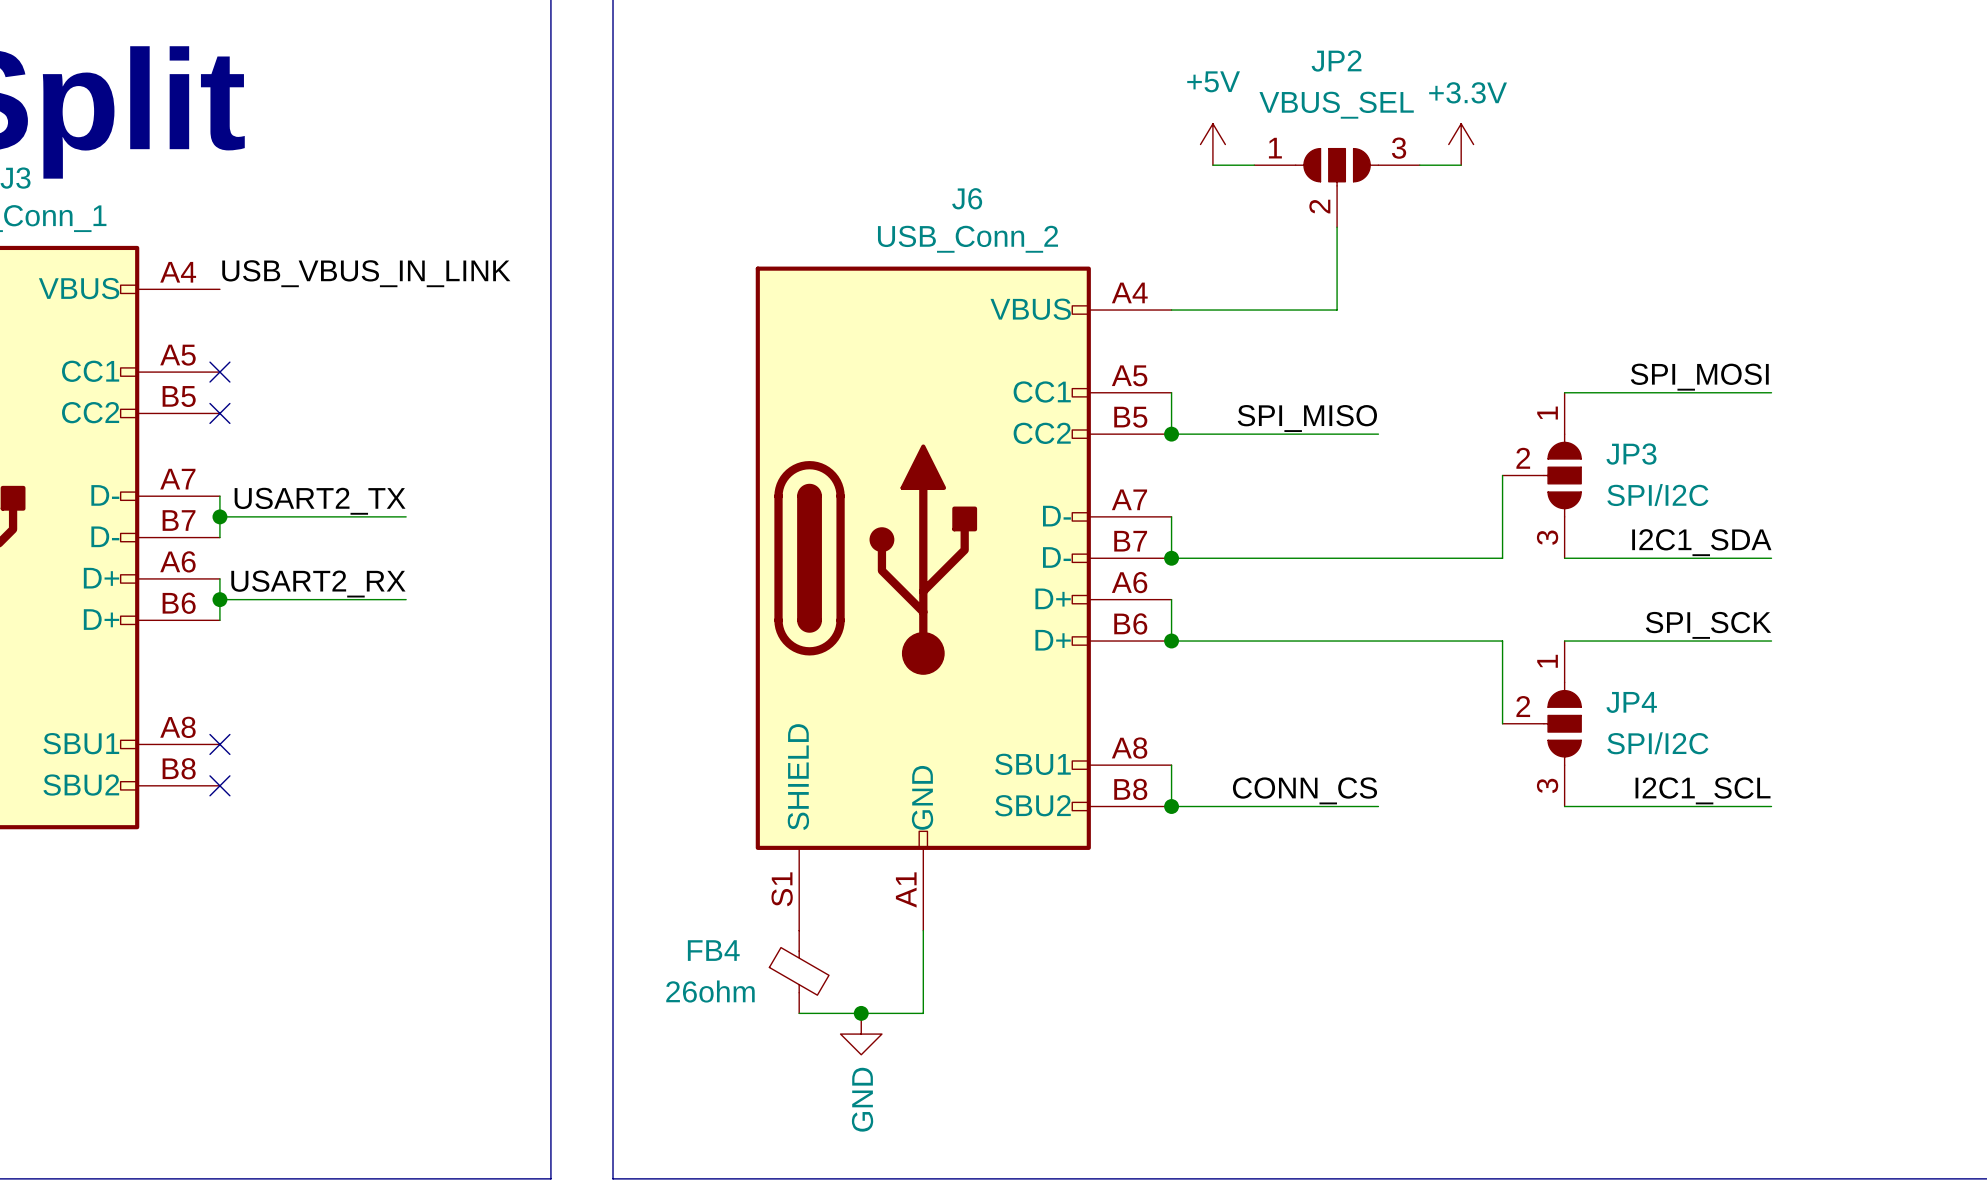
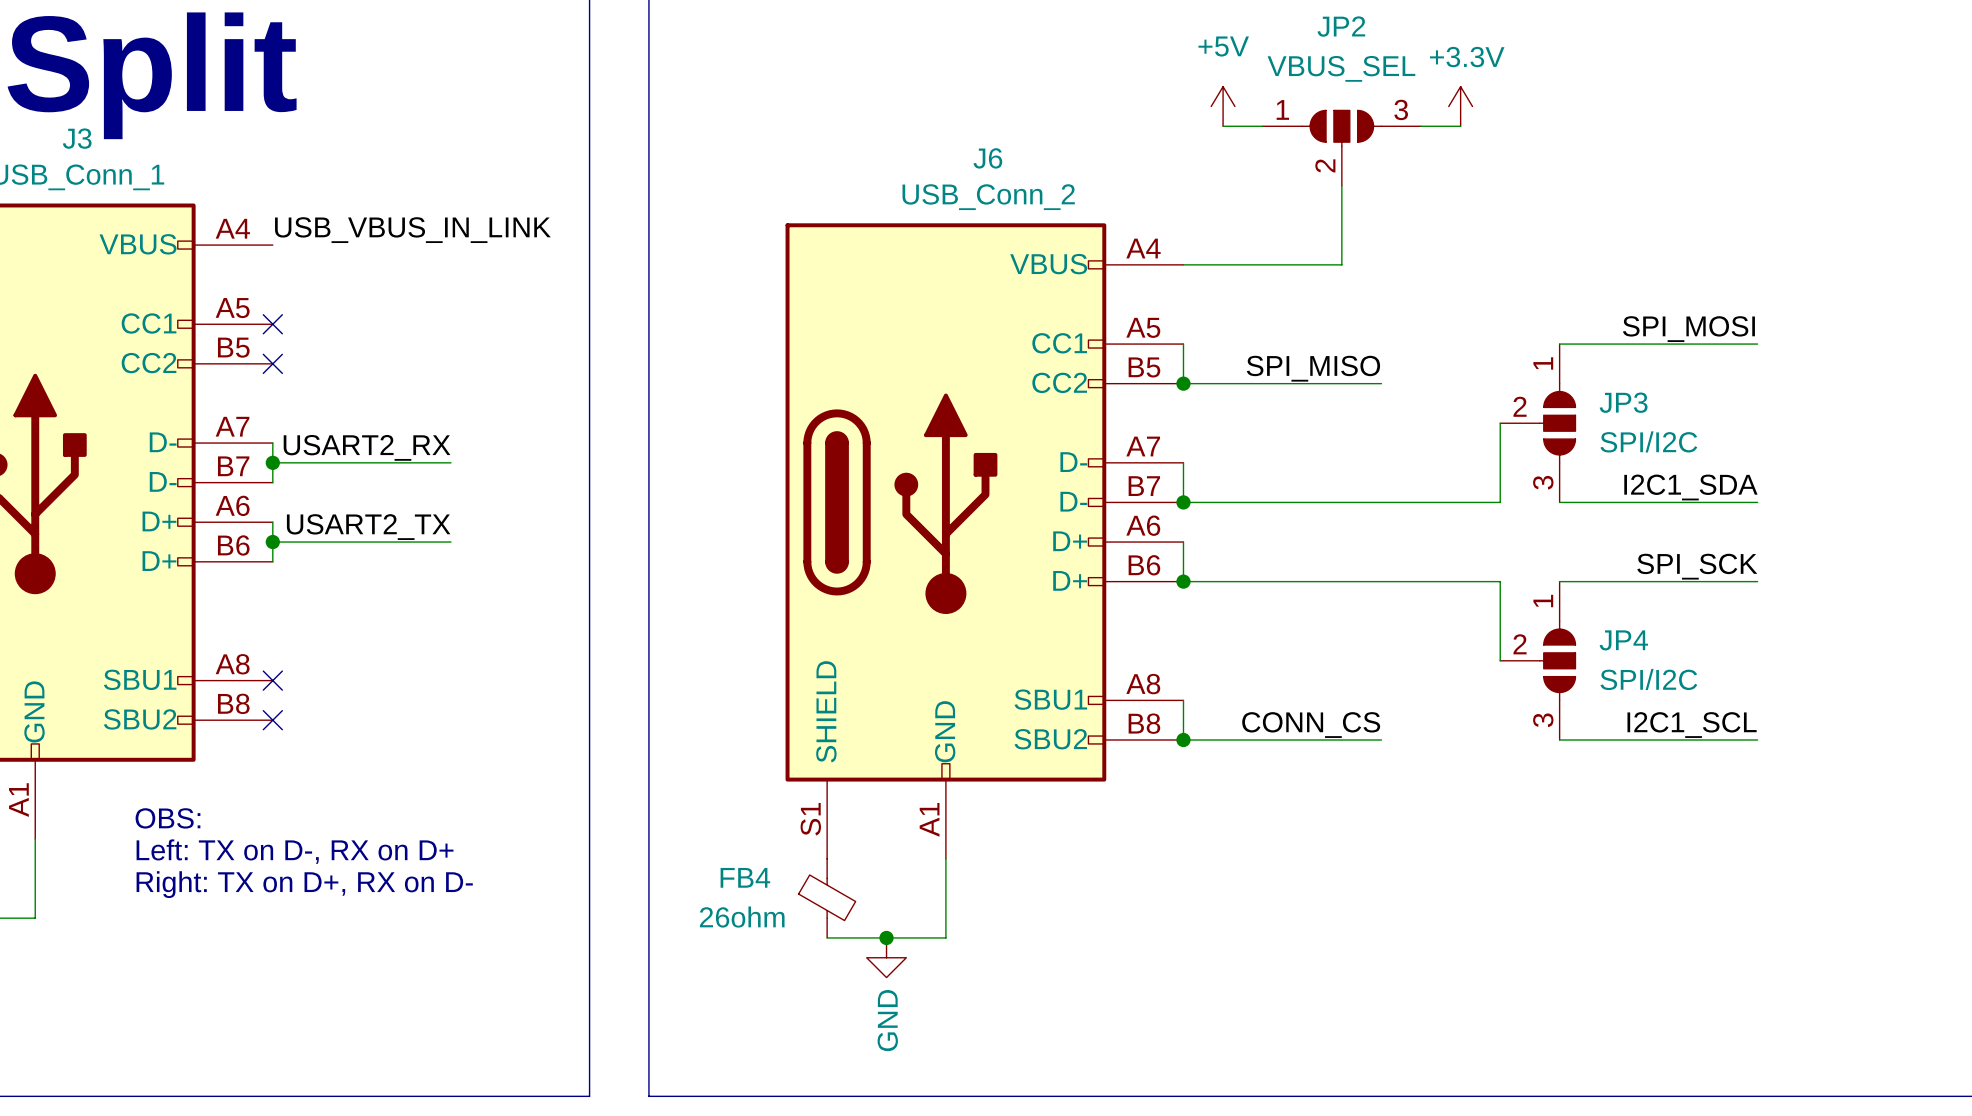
label: USART2_TX (320, 501) -> USART2_RX (367, 447)
label: USART2_RX (318, 584) -> USART2_TX (368, 527)
text: none -> OBS: (167, 818)
text: none -> Left: TX on D-, RX on D+ (295, 851)
text: none -> Right: TX on D+, RX on D- (304, 884)

